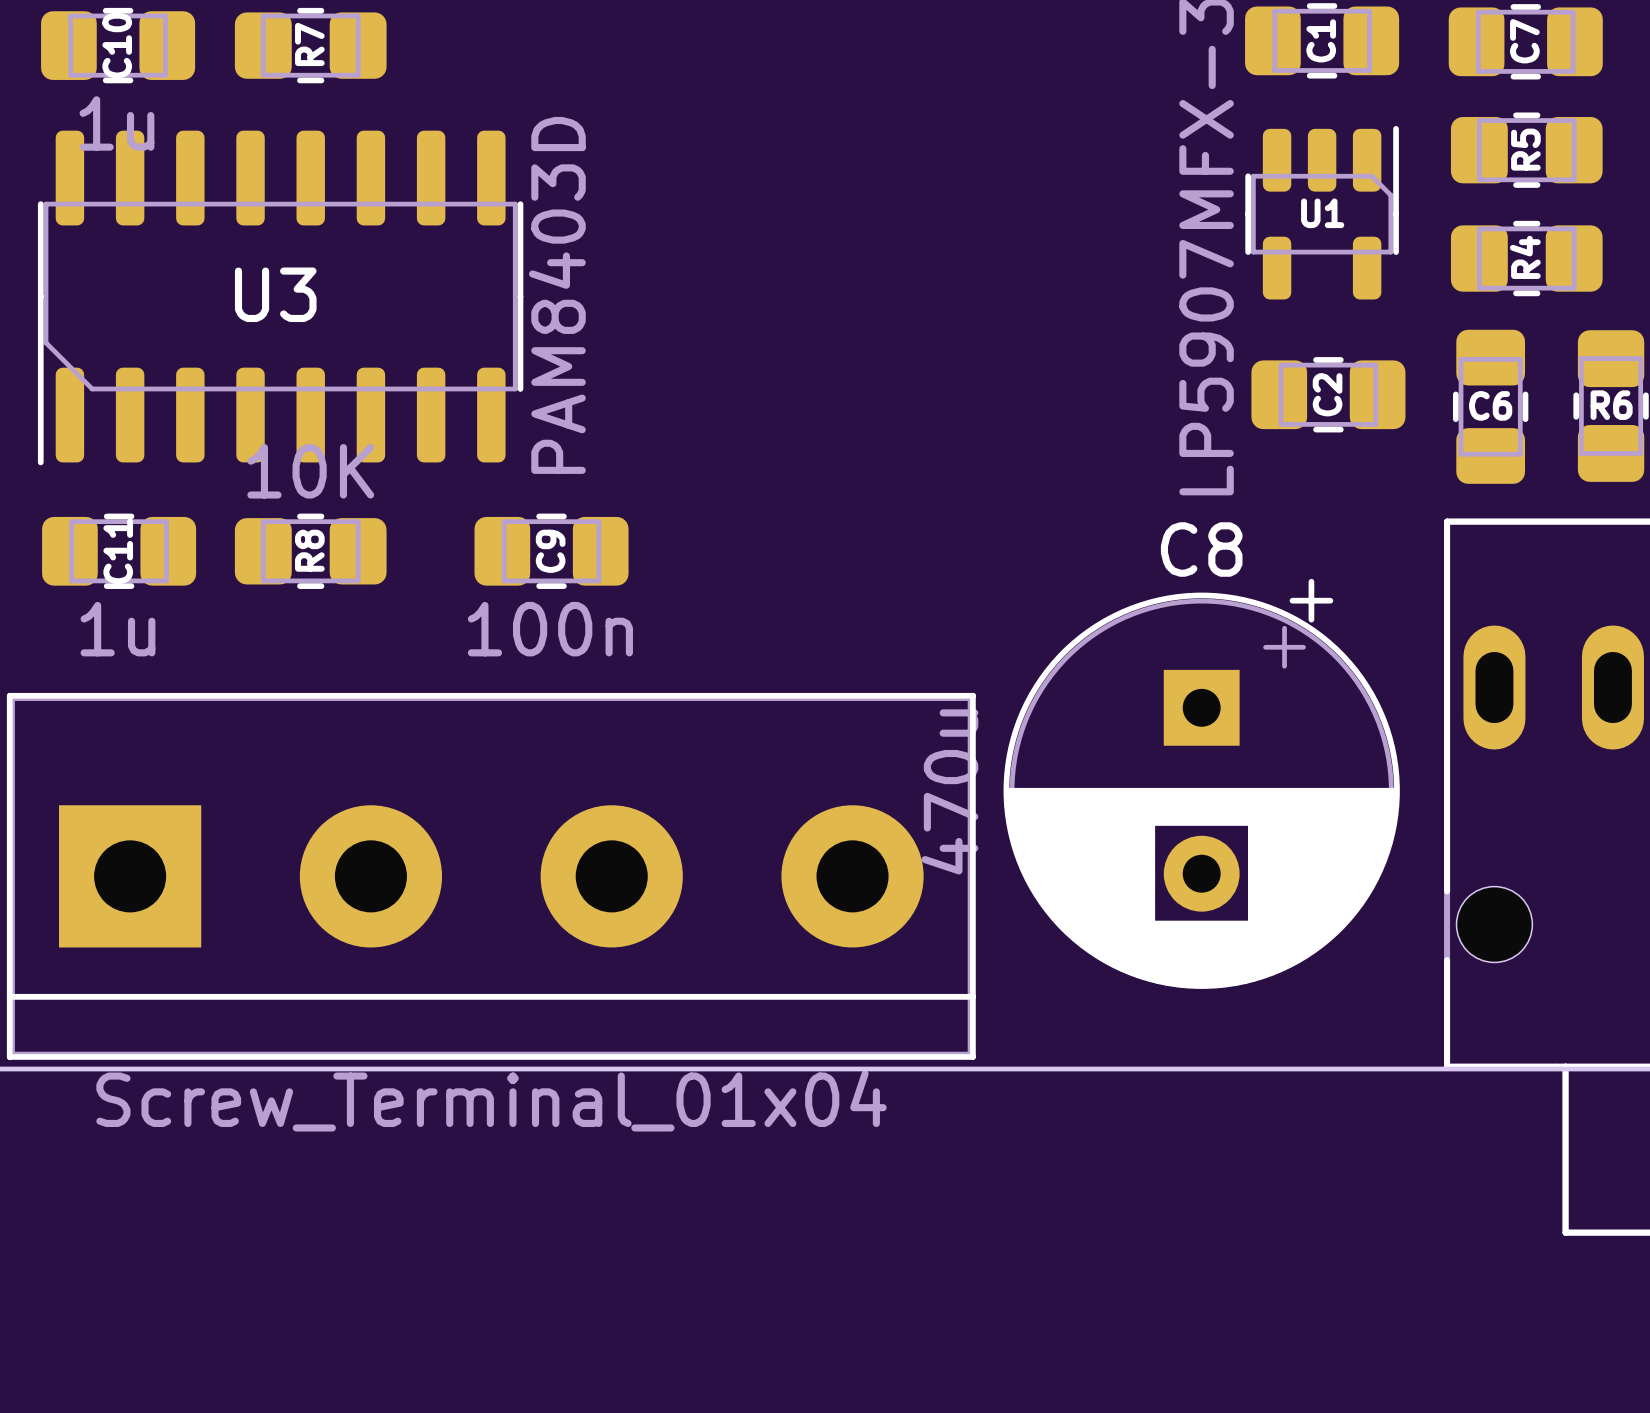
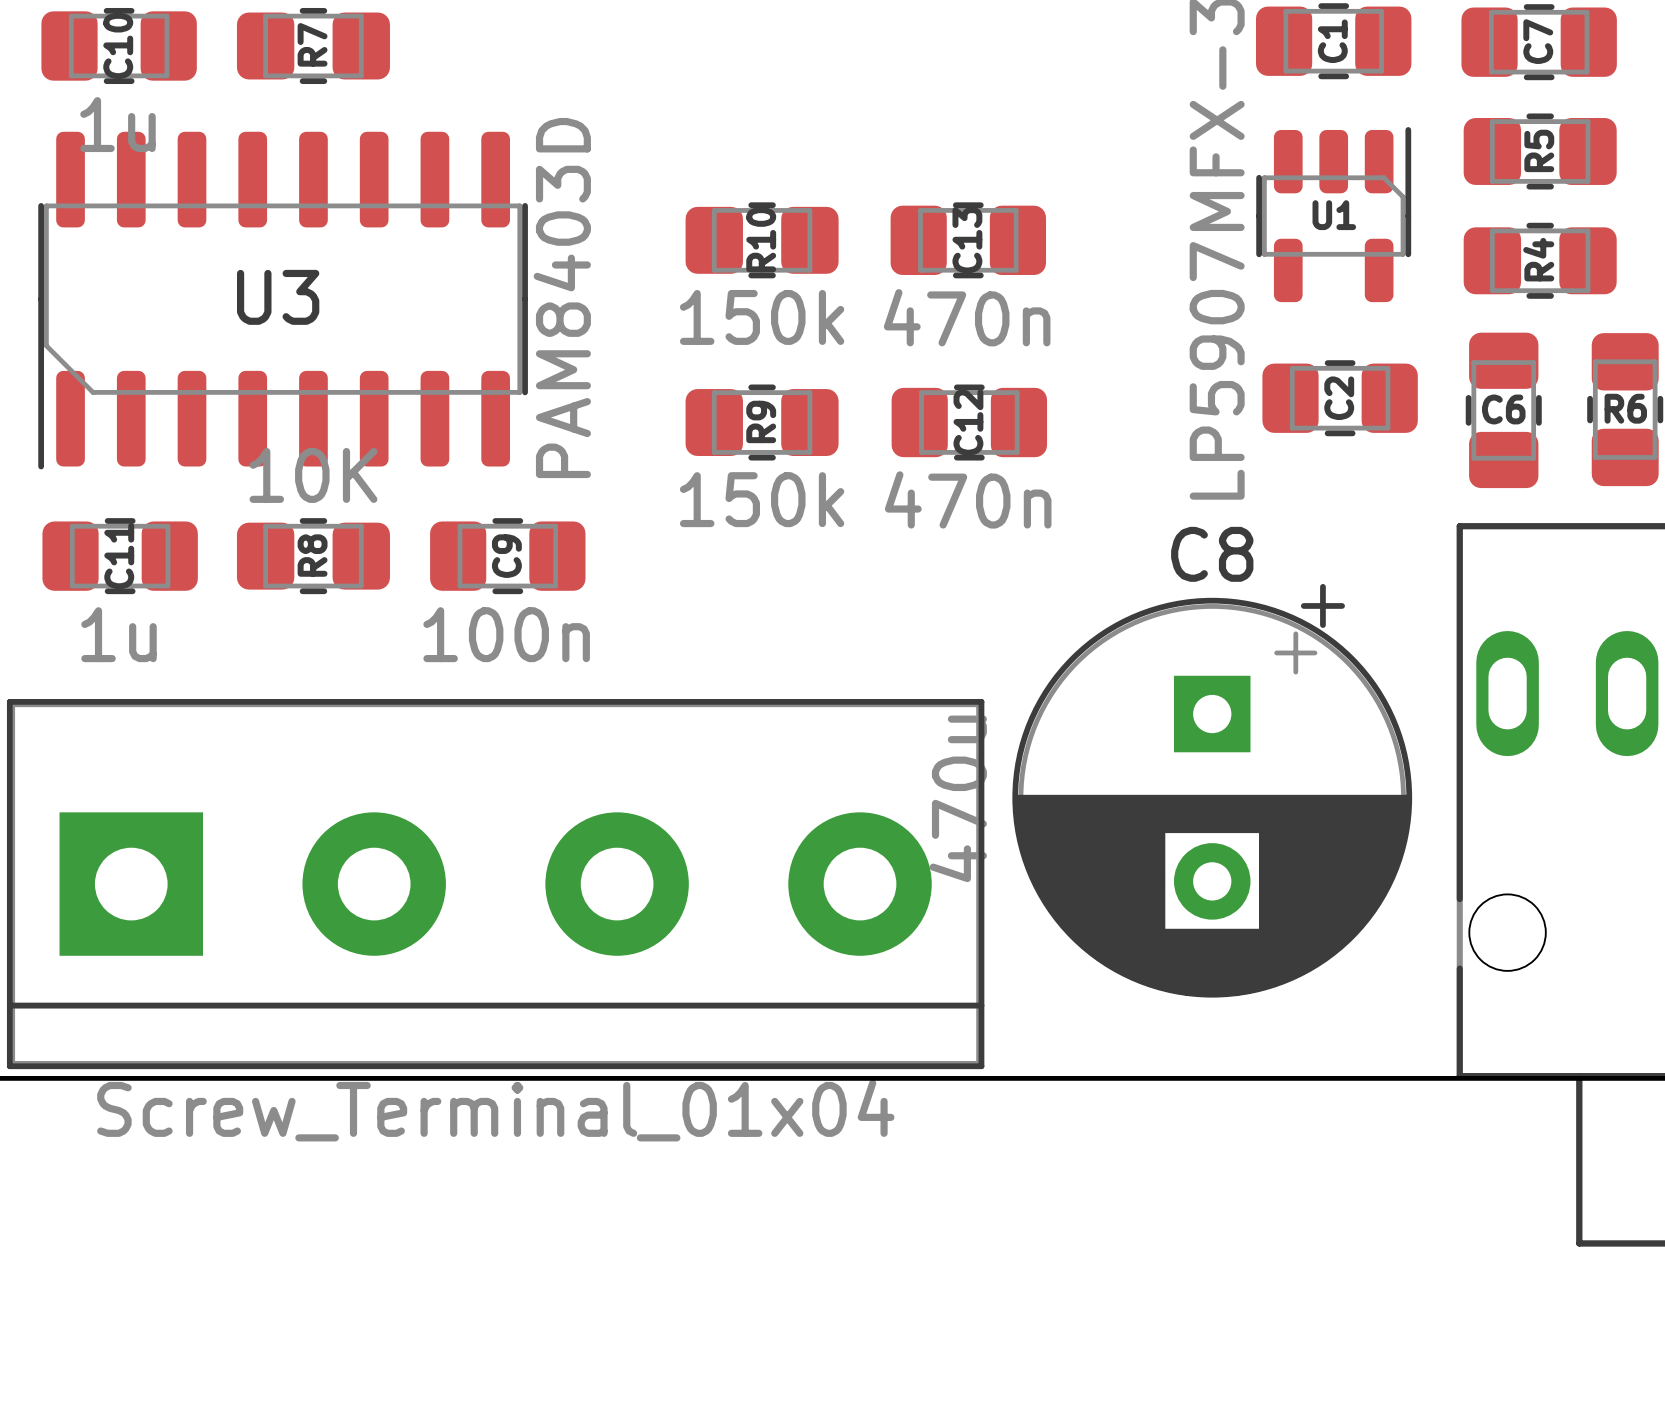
R10: none -> 150k (762, 240)
C13: none -> 470n (968, 240)
R9: none -> 150k (762, 422)
C12: none -> 470n (969, 422)
C9 position: (551, 551) -> (507, 556)

